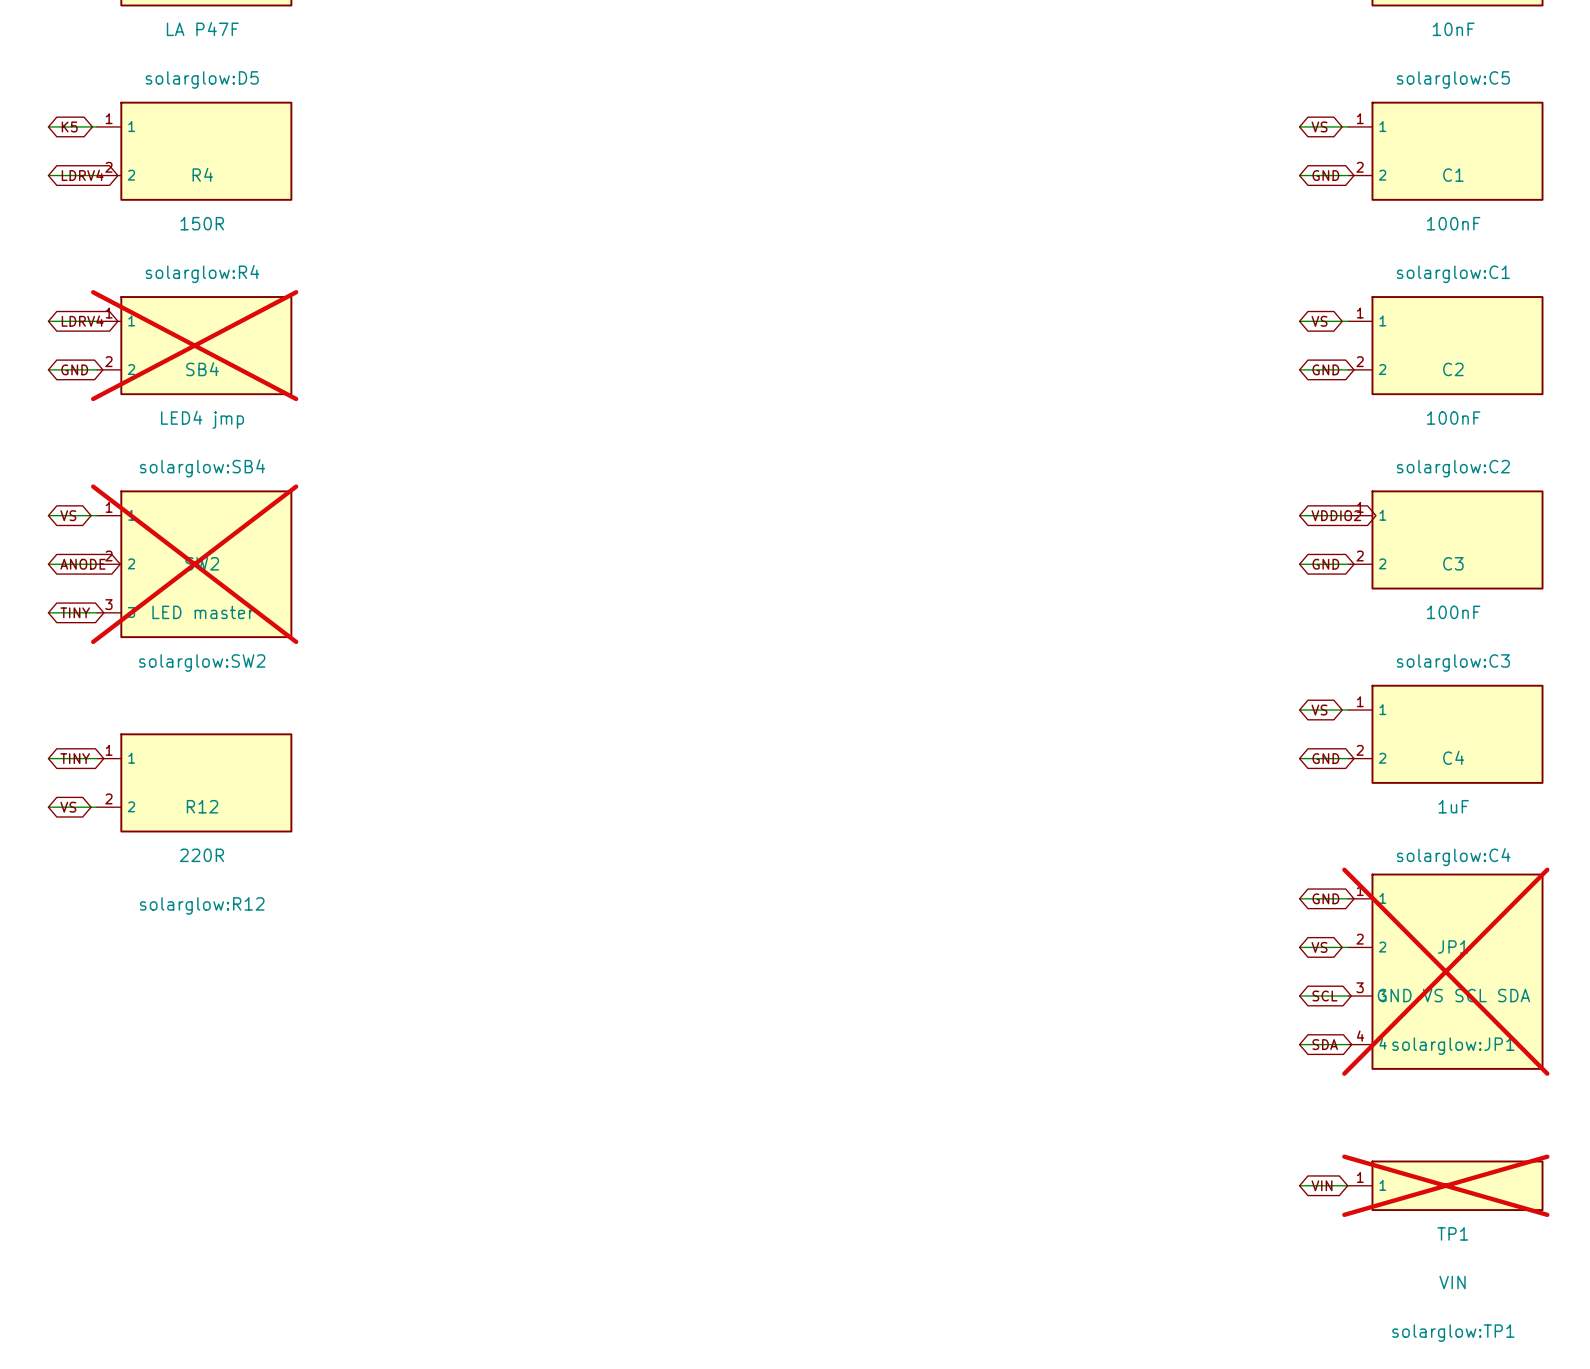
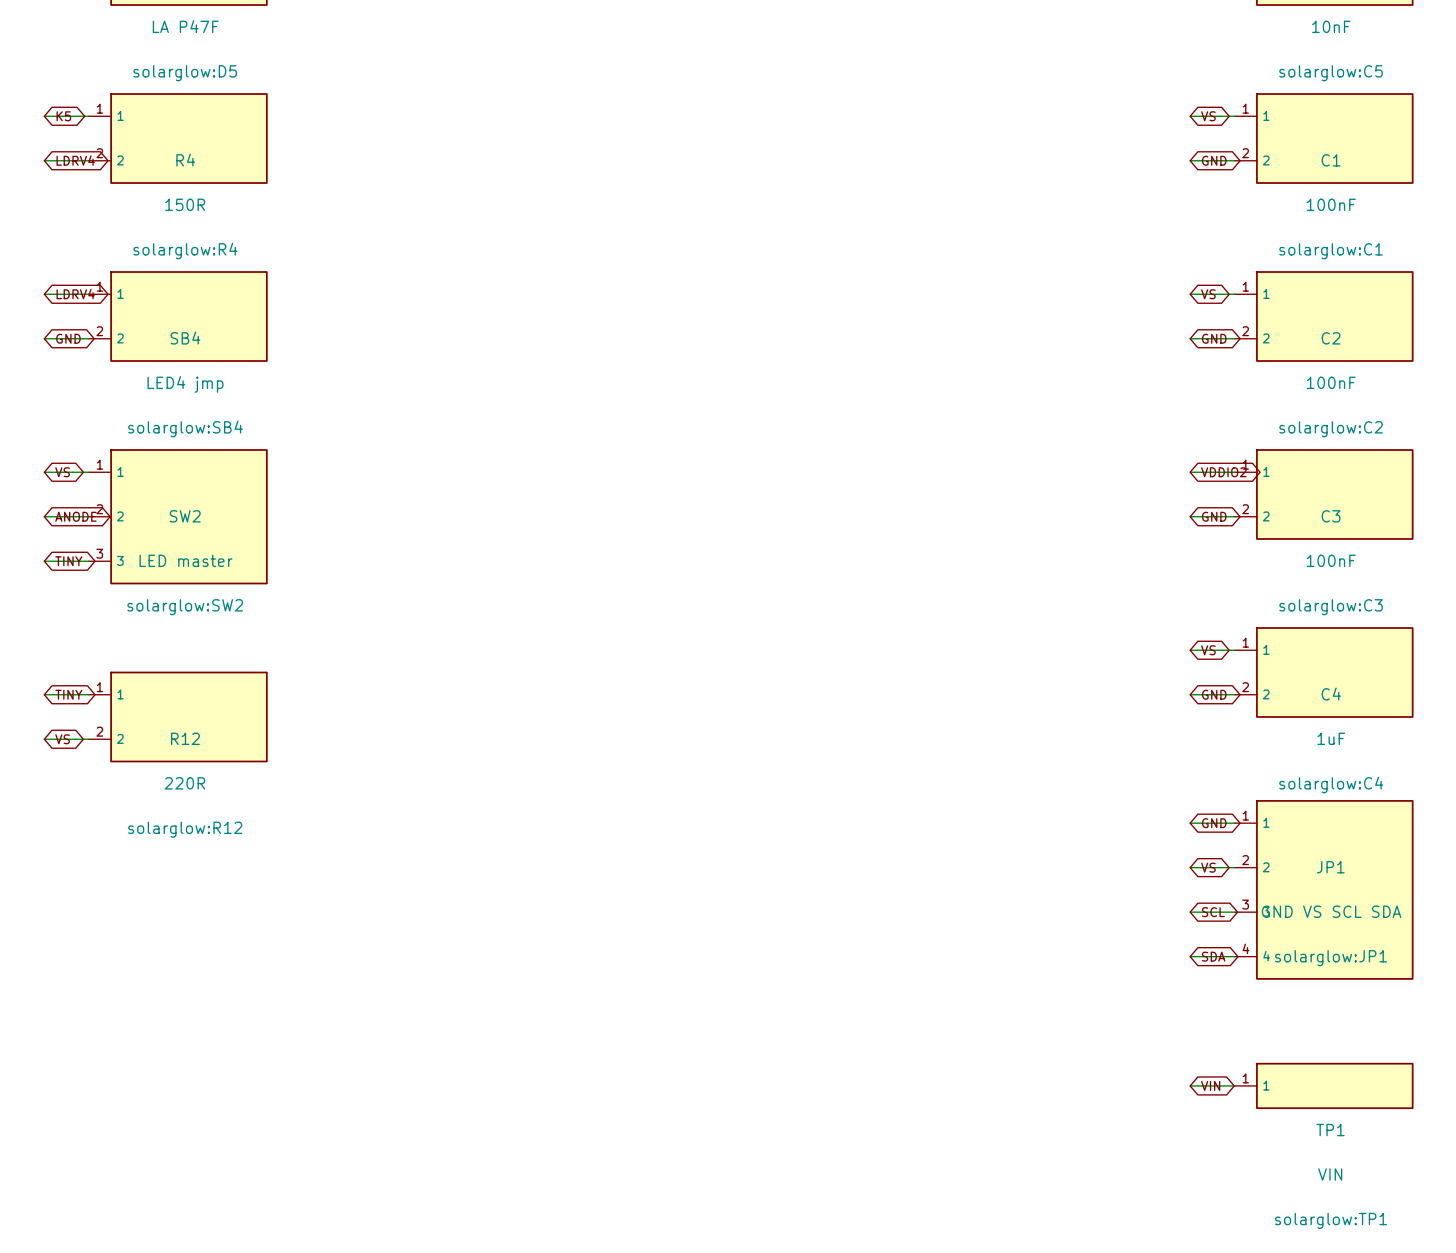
SB4 do-not-place cross: (194, 345) -> none
SW2 do-not-place cross: (194, 564) -> none
JP1 do-not-place cross: (1445, 971) -> none
TP1 do-not-place cross: (1445, 1185) -> none

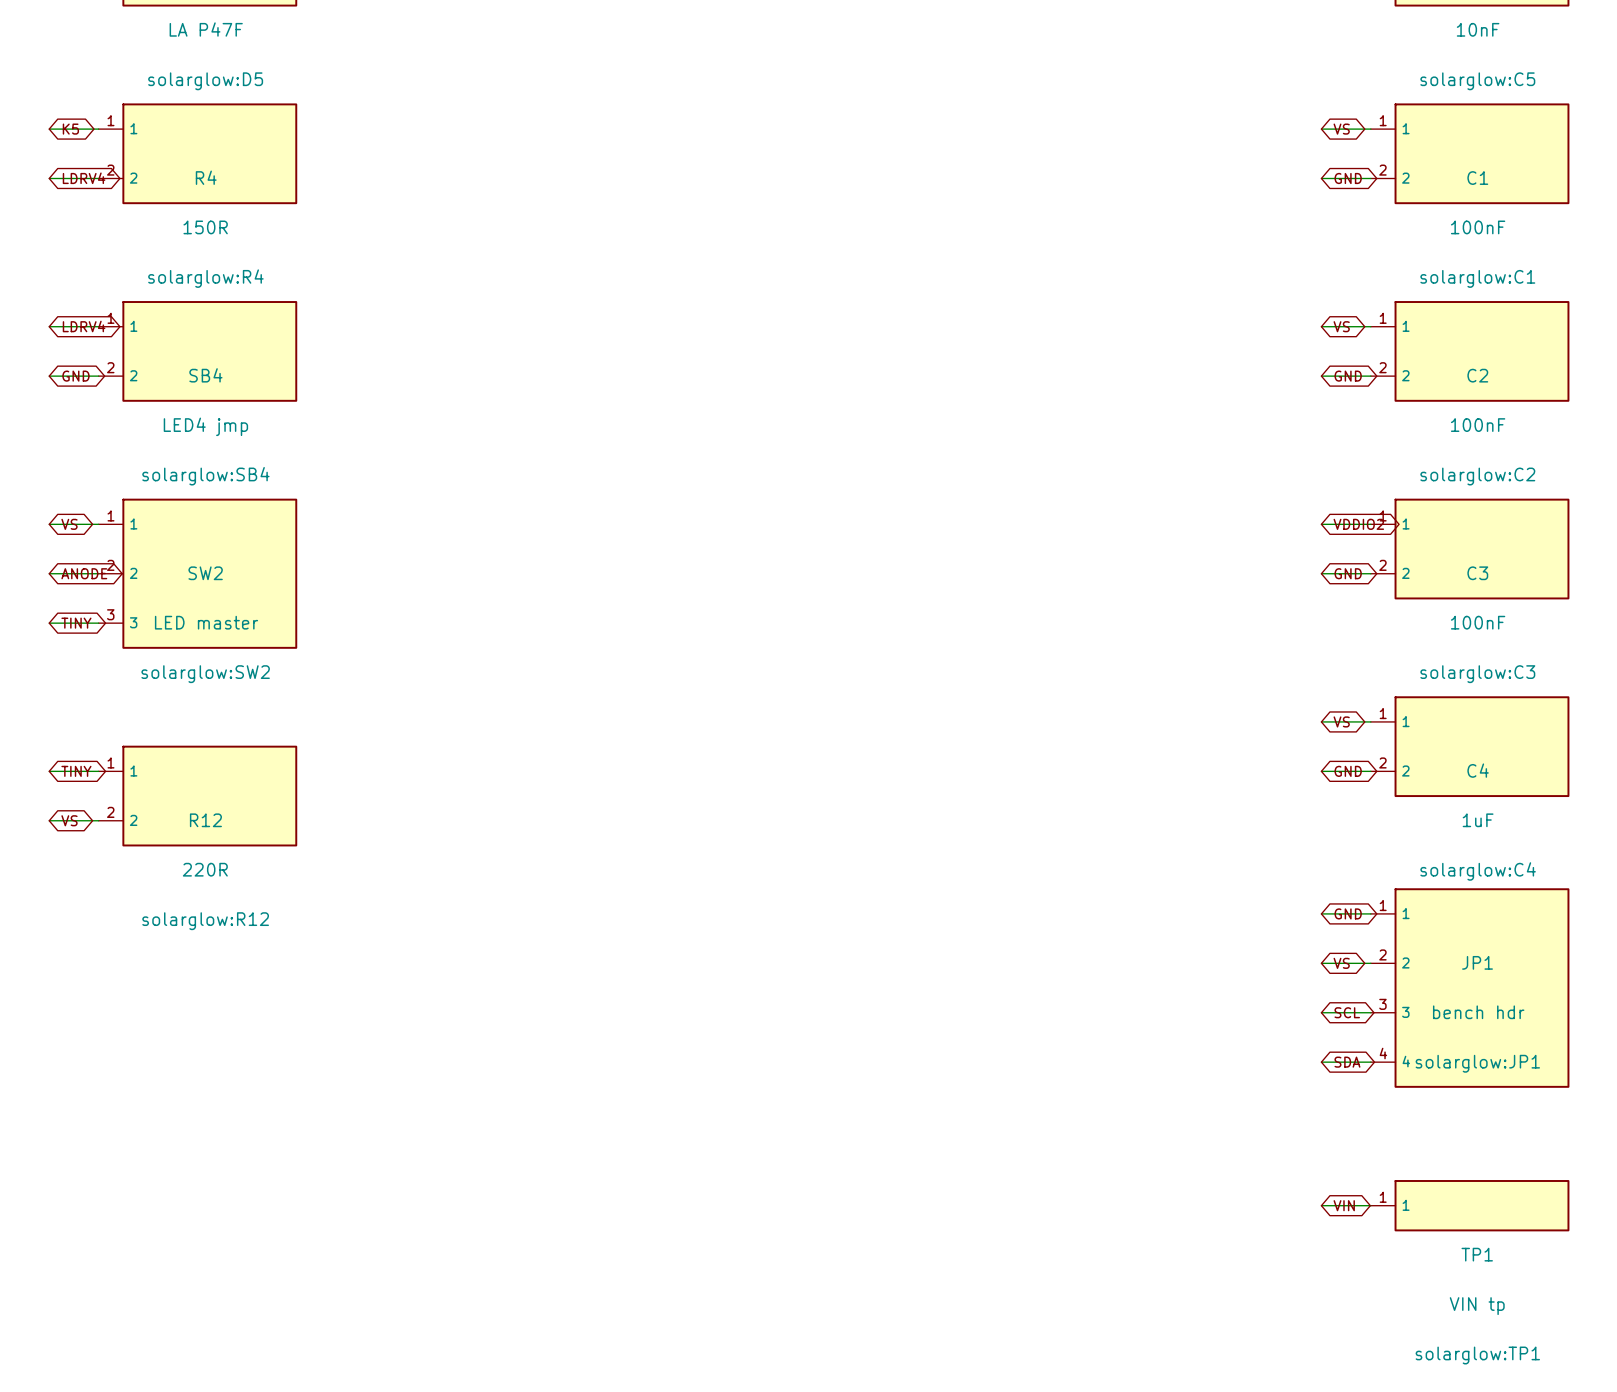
JP1 value: GND VS SCL SDA (1331, 911) -> bench hdr (1478, 1012)
TP1 value: VIN (1330, 1174) -> VIN tp (1477, 1306)

